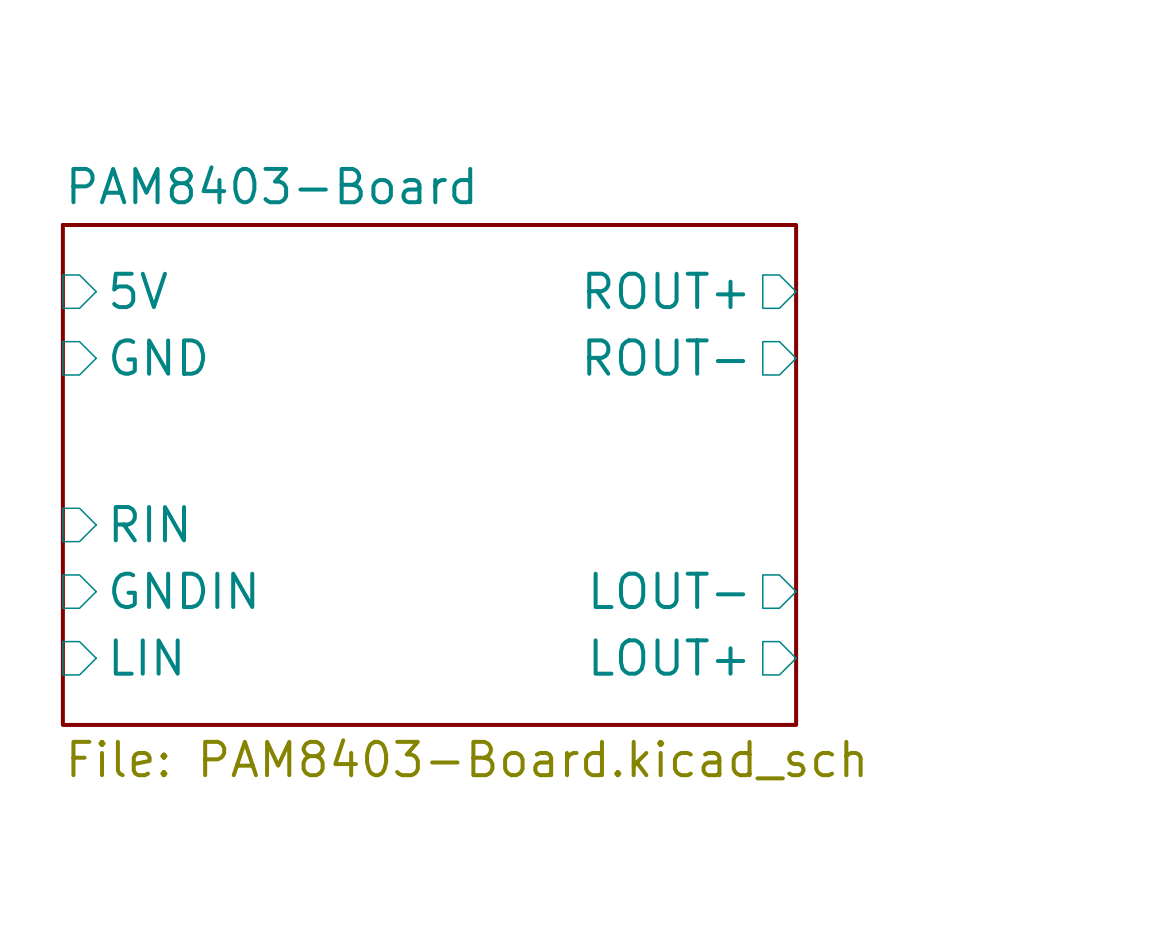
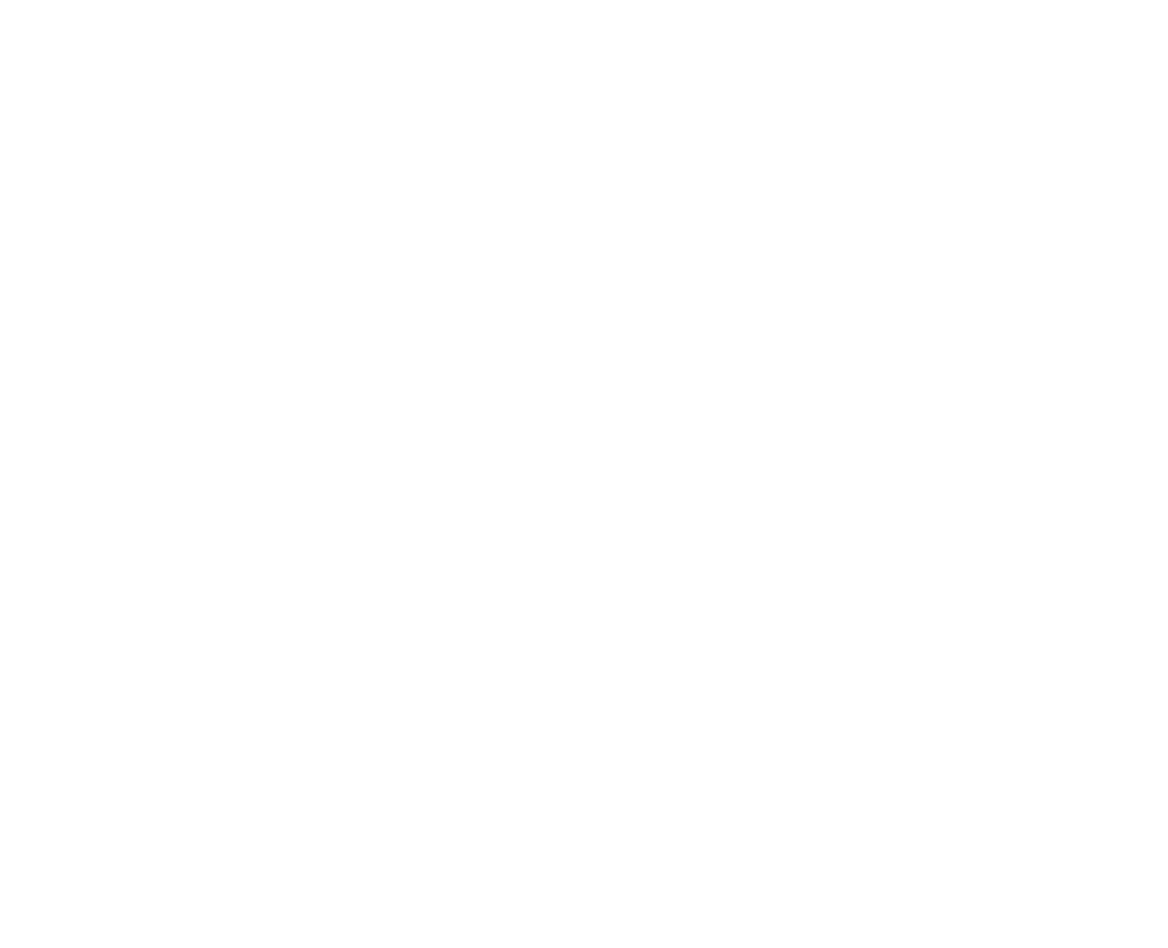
sheet pin: 5V (139, 290) -> none
sheet pin: ROUT+ (666, 290) -> none
sheet pin: GND (158, 357) -> none
sheet pin: ROUT- (666, 357) -> none
sheet PAM8403-Board: File: PAM8403-Board.kicad_sch (429, 474) -> none
sheet pin: RIN (149, 523) -> none
sheet pin: GNDIN (183, 590) -> none
sheet pin: LOUT- (669, 590) -> none
sheet pin: LIN (146, 657) -> none
sheet pin: LOUT+ (669, 657) -> none

